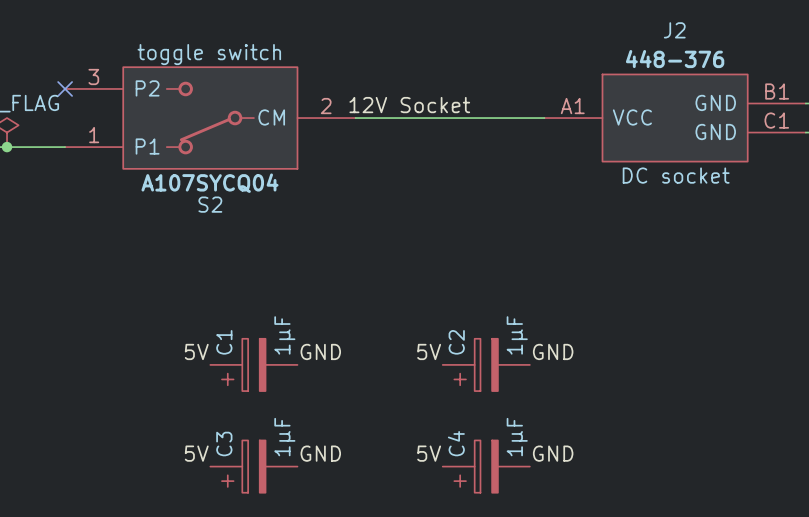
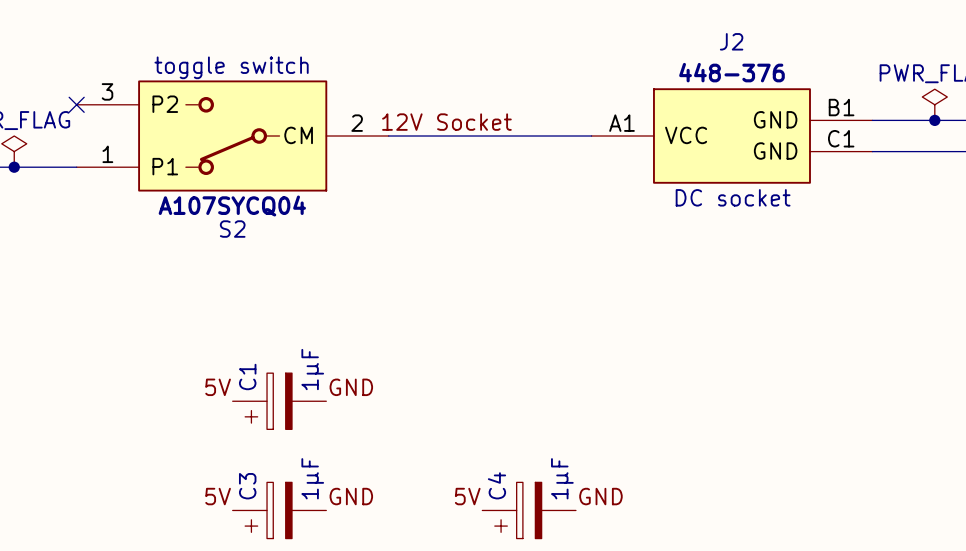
label: 5V (429, 351) -> none
label: GND (553, 351) -> none
C2: 1μF (486, 364) -> none

